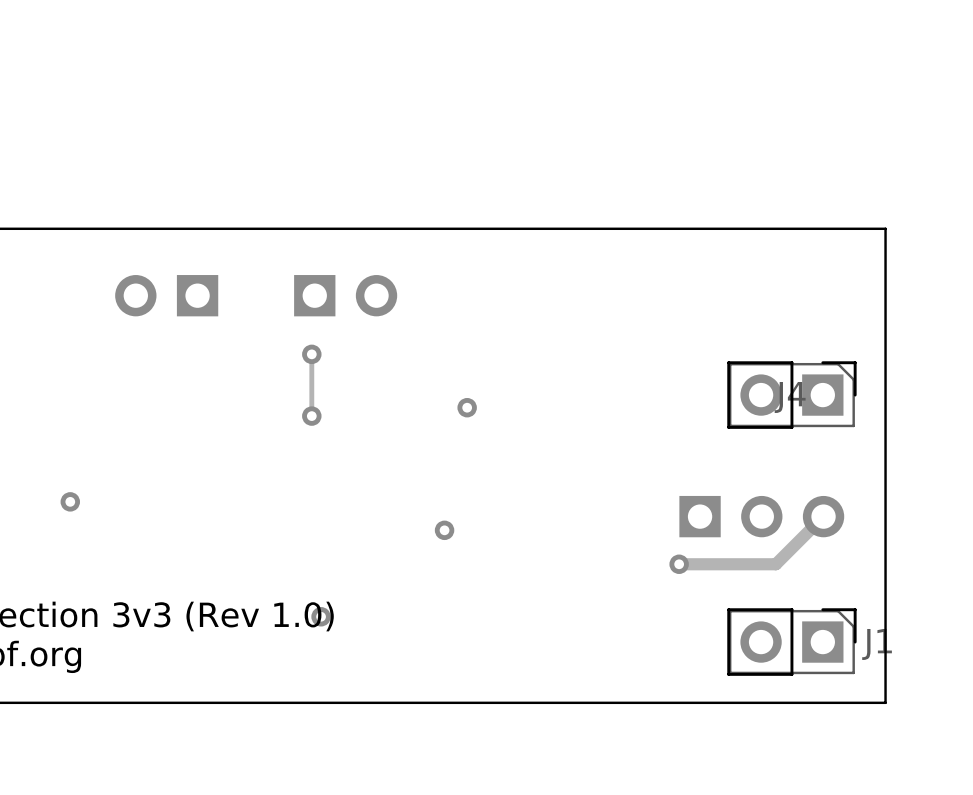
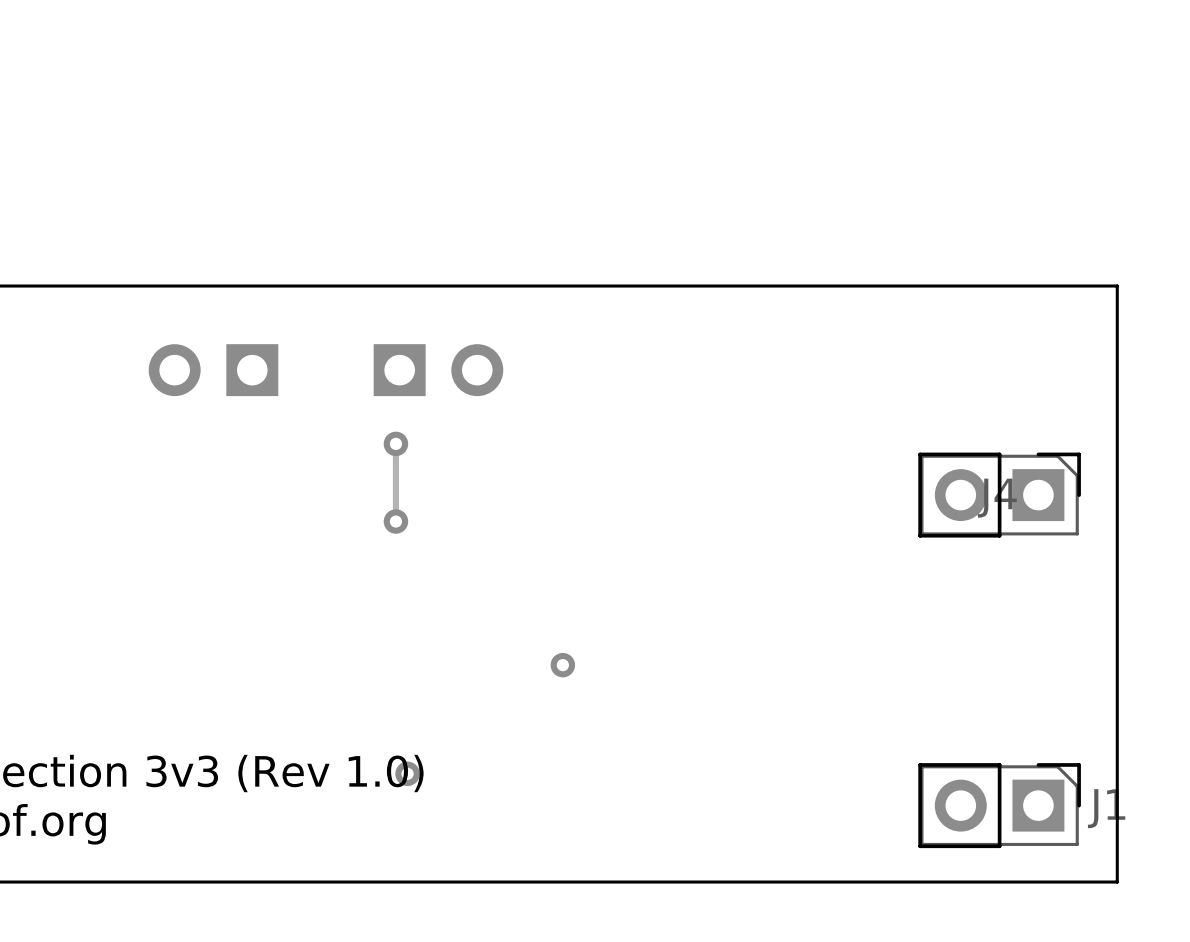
via: (467, 407) -> none
via: (70, 501) -> none
part: (761, 516) -> none
track: (823, 516) (775, 564) (679, 564) -> none
via: (679, 564) -> none

